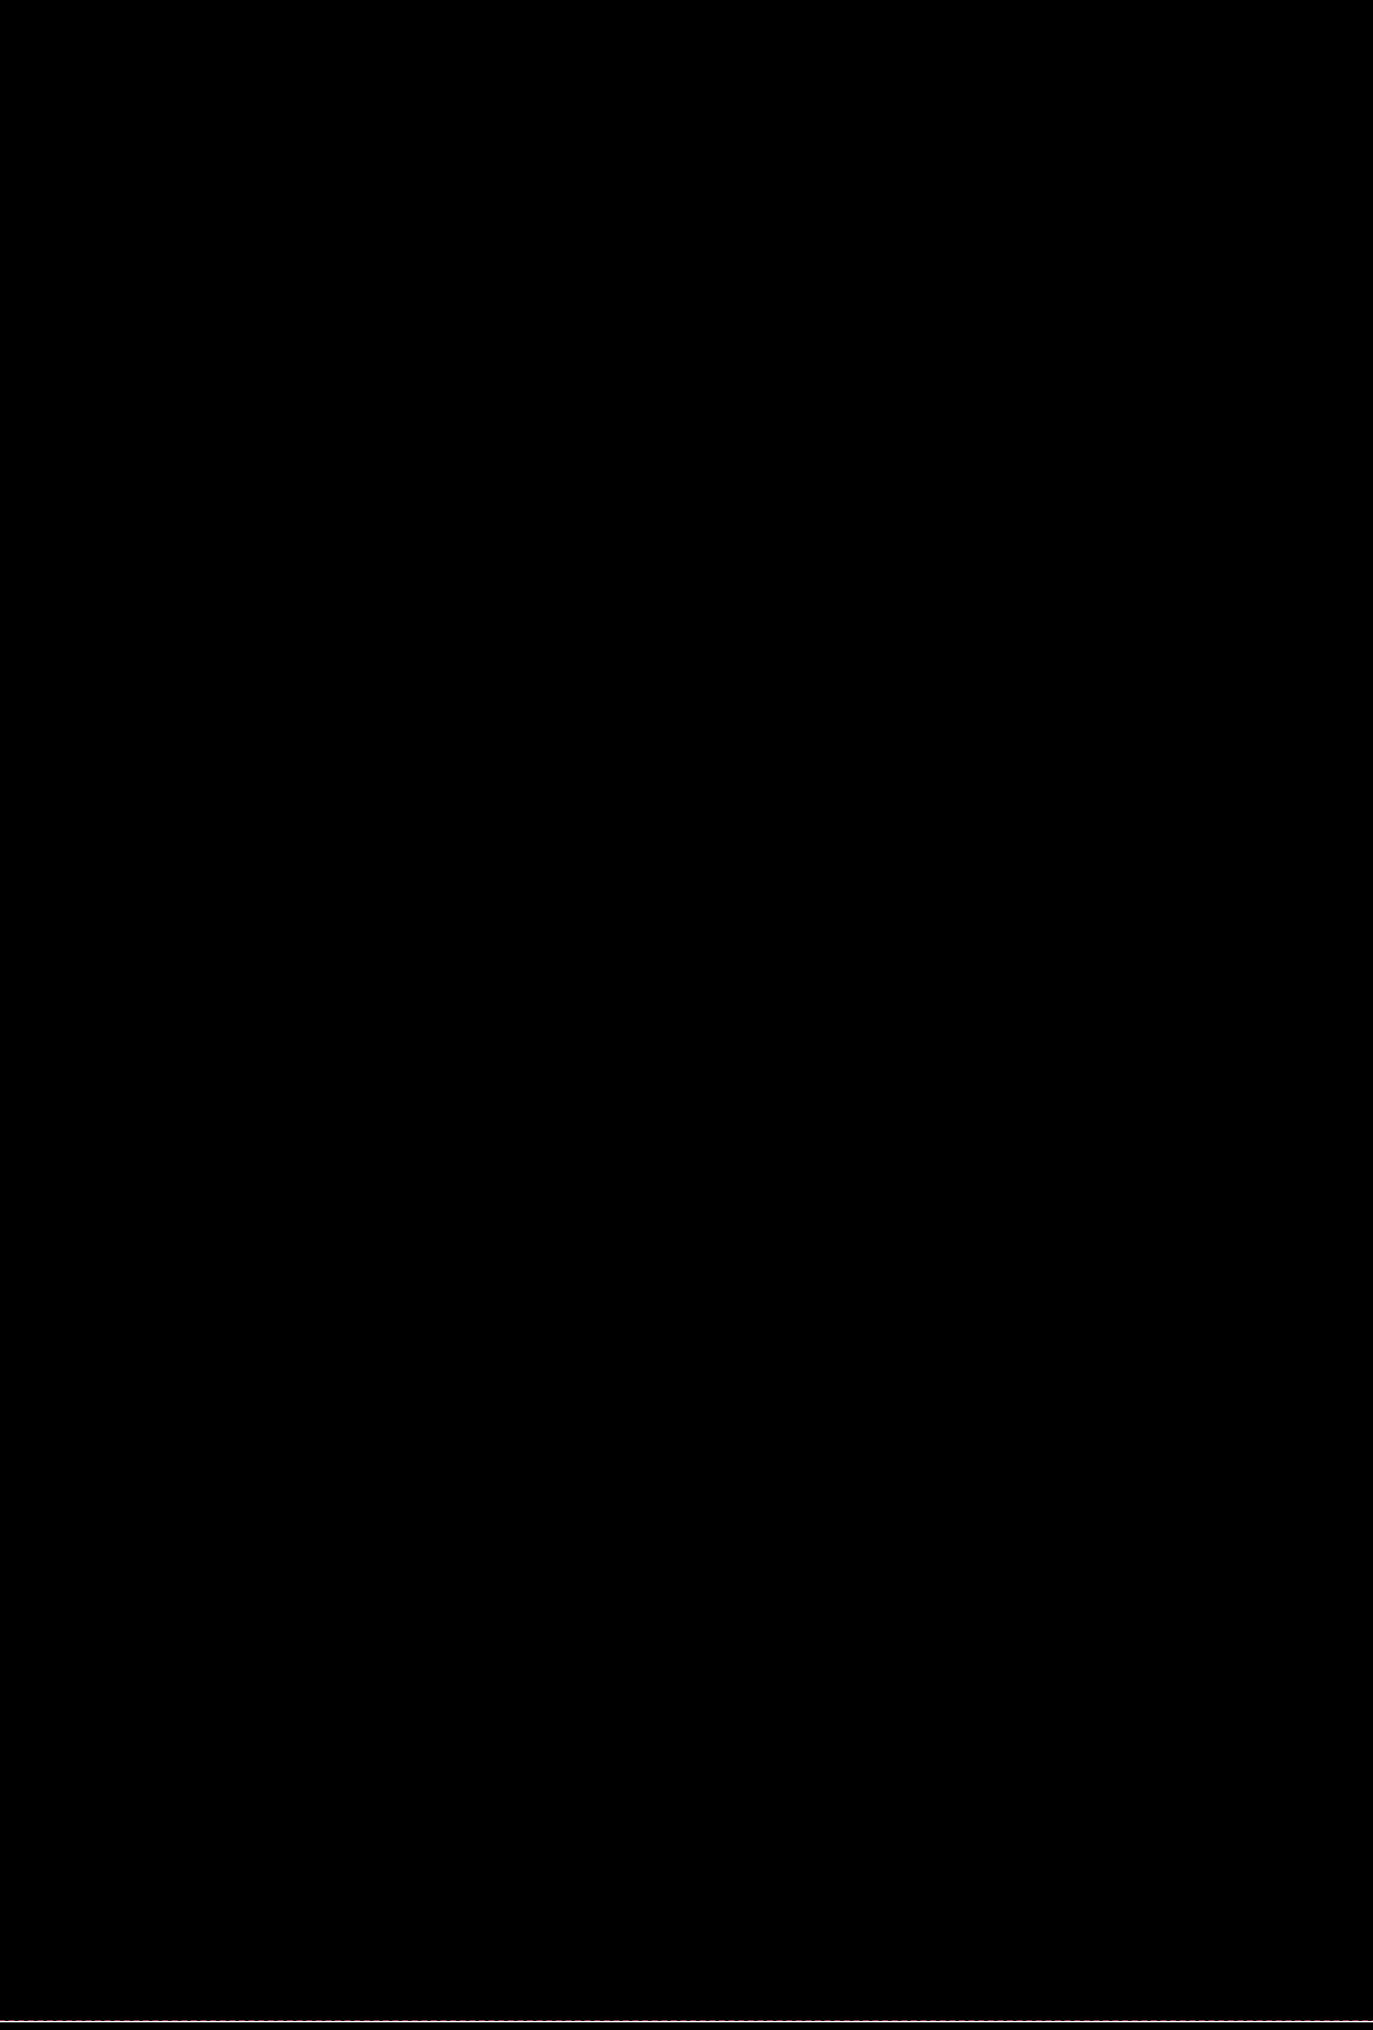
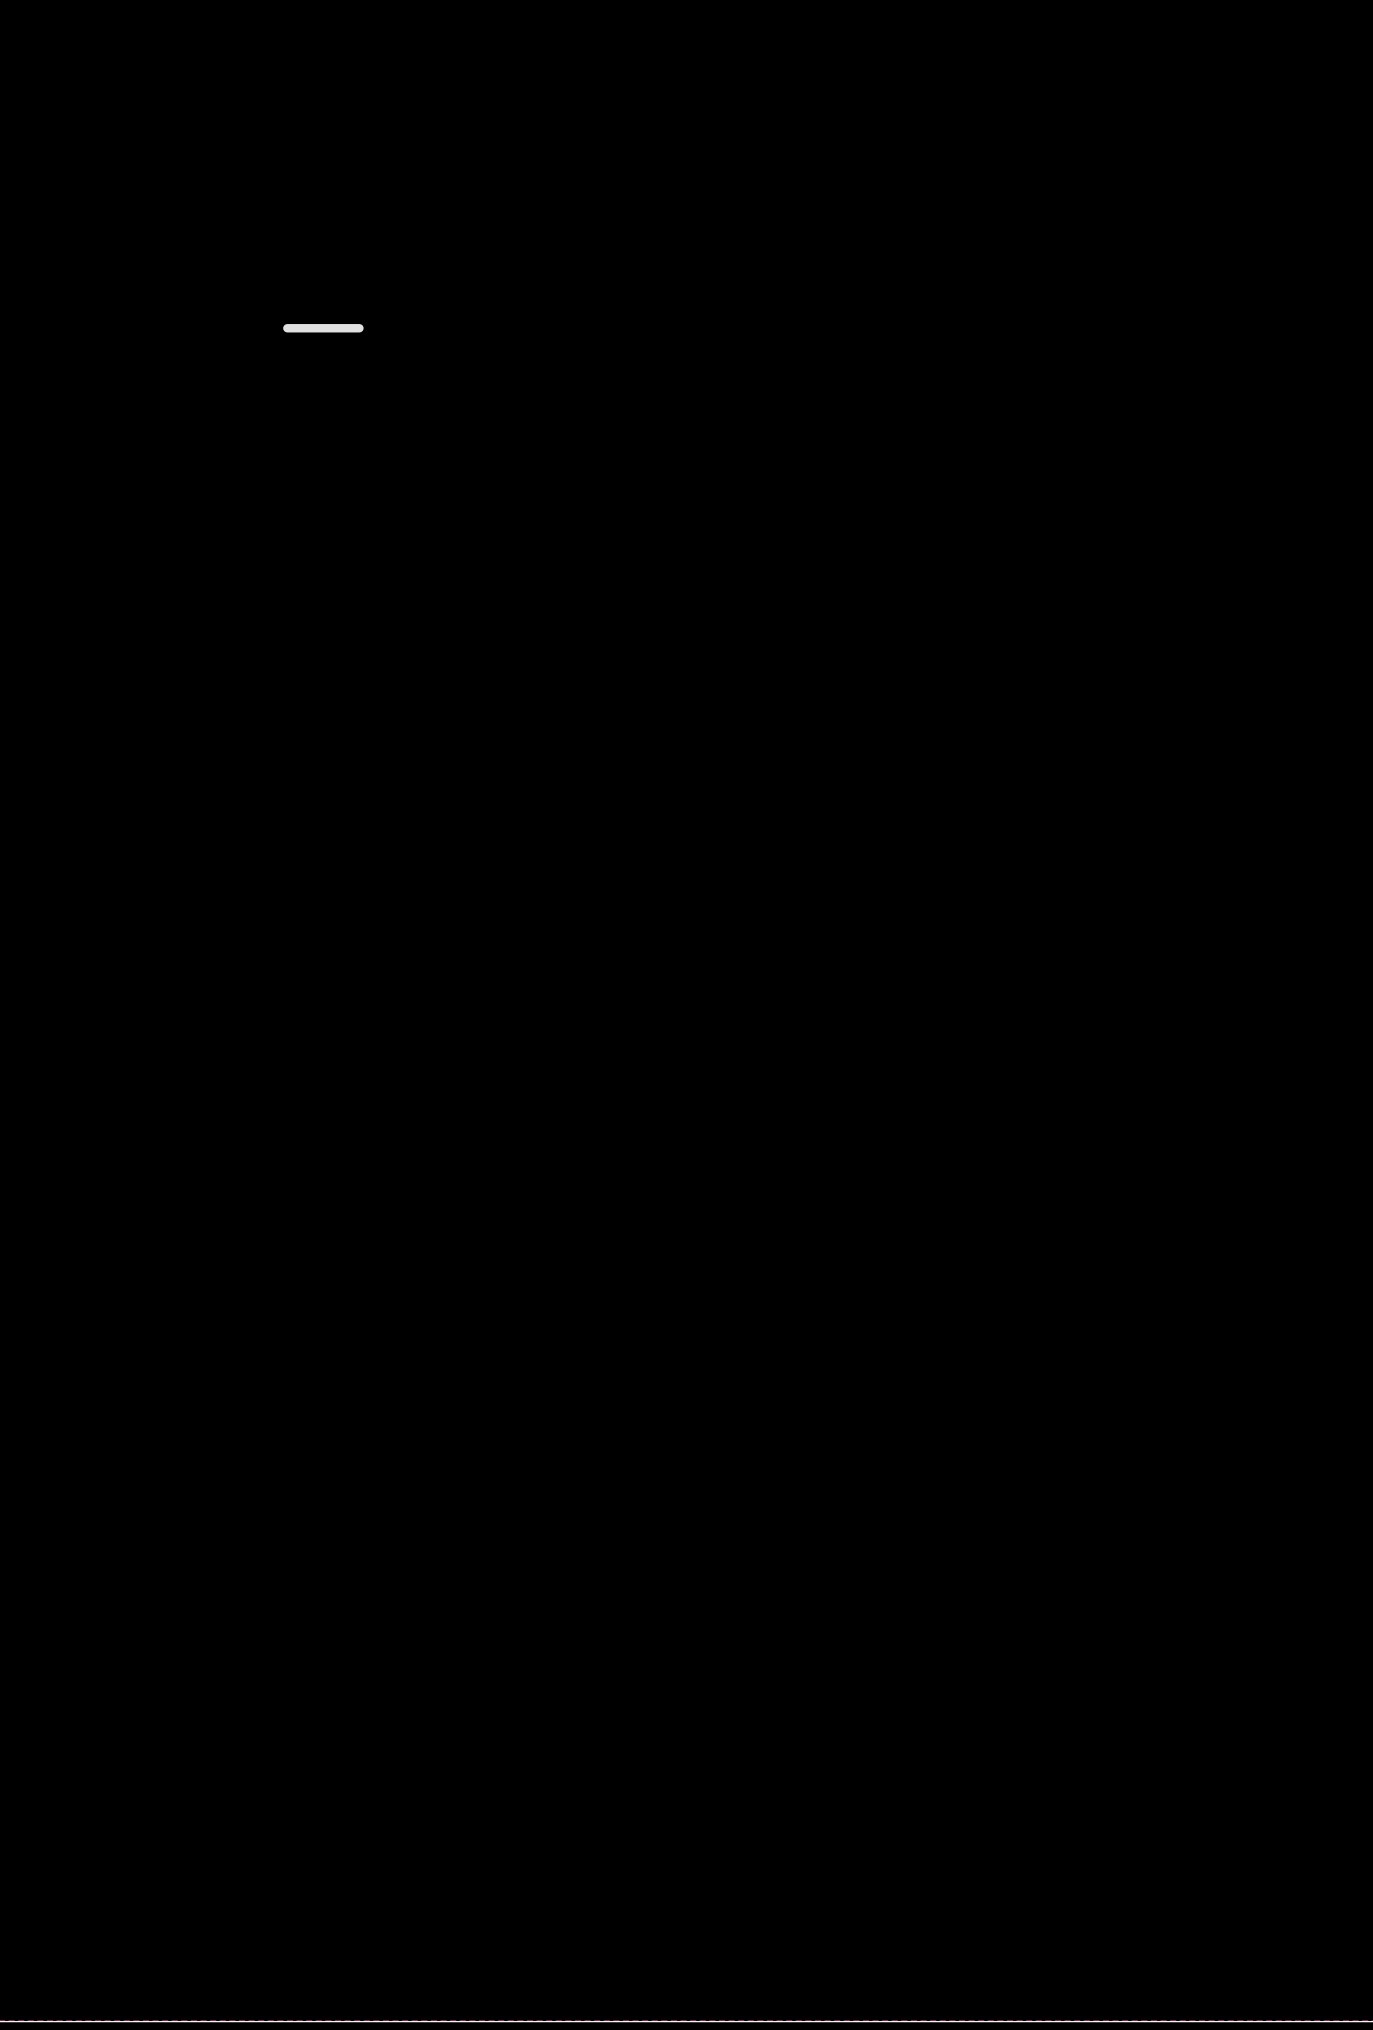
text: none -> - (323, 328)

